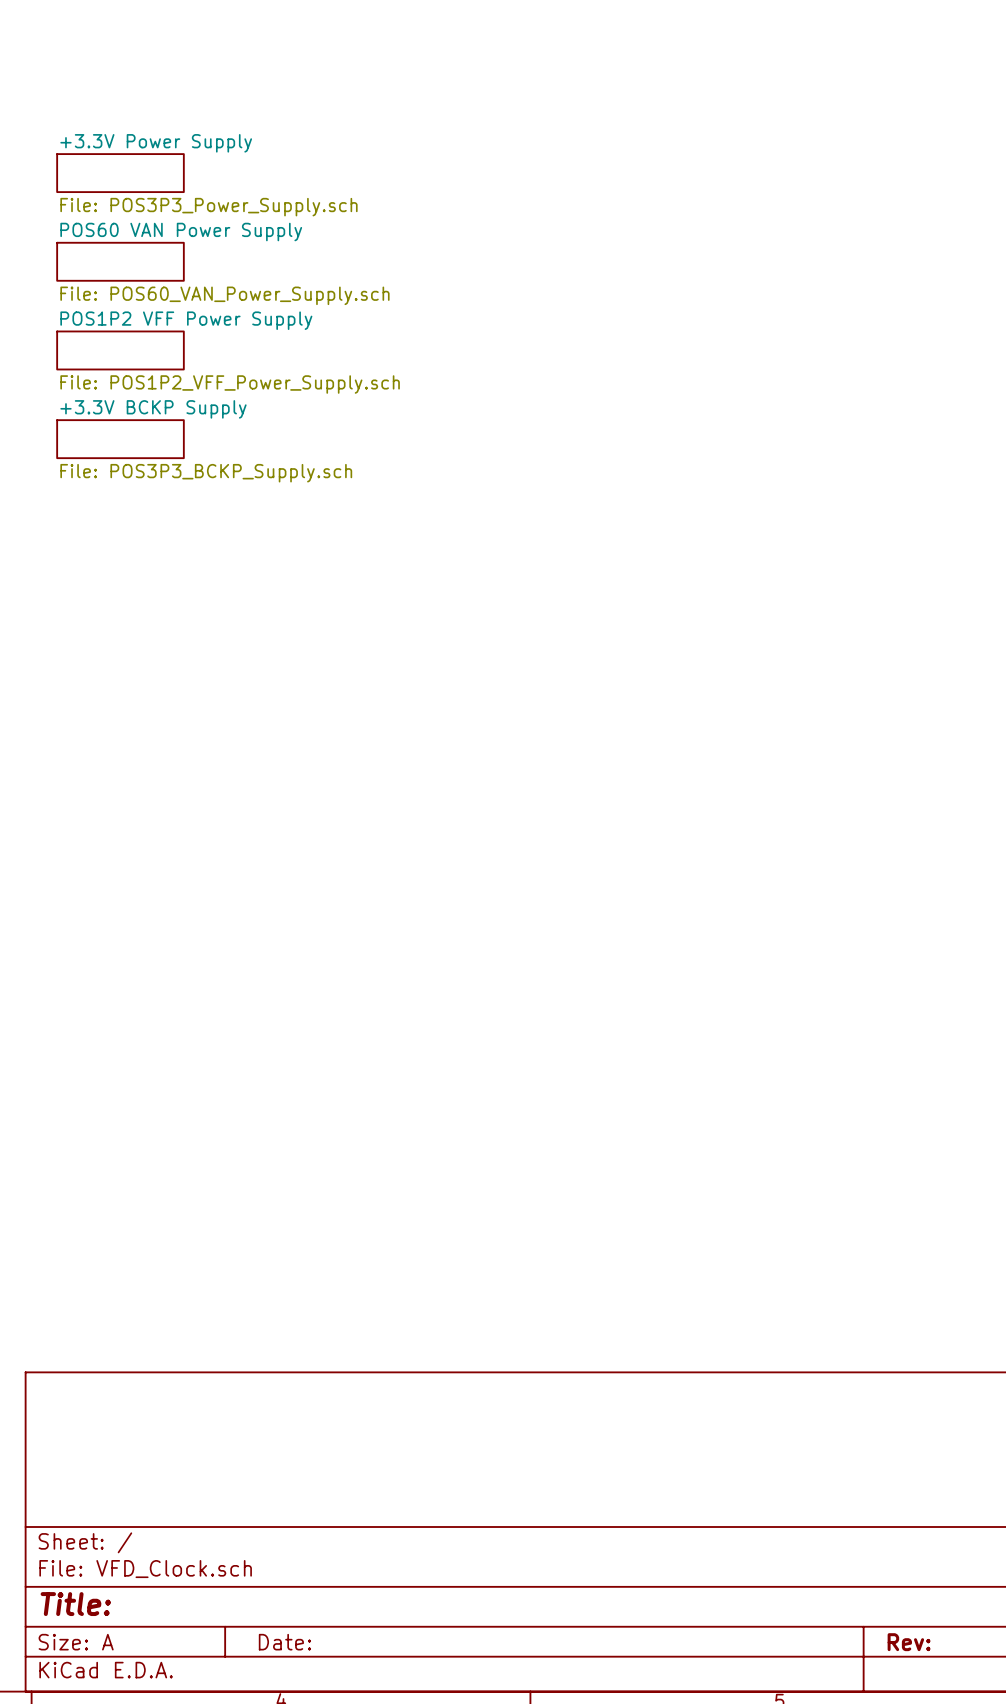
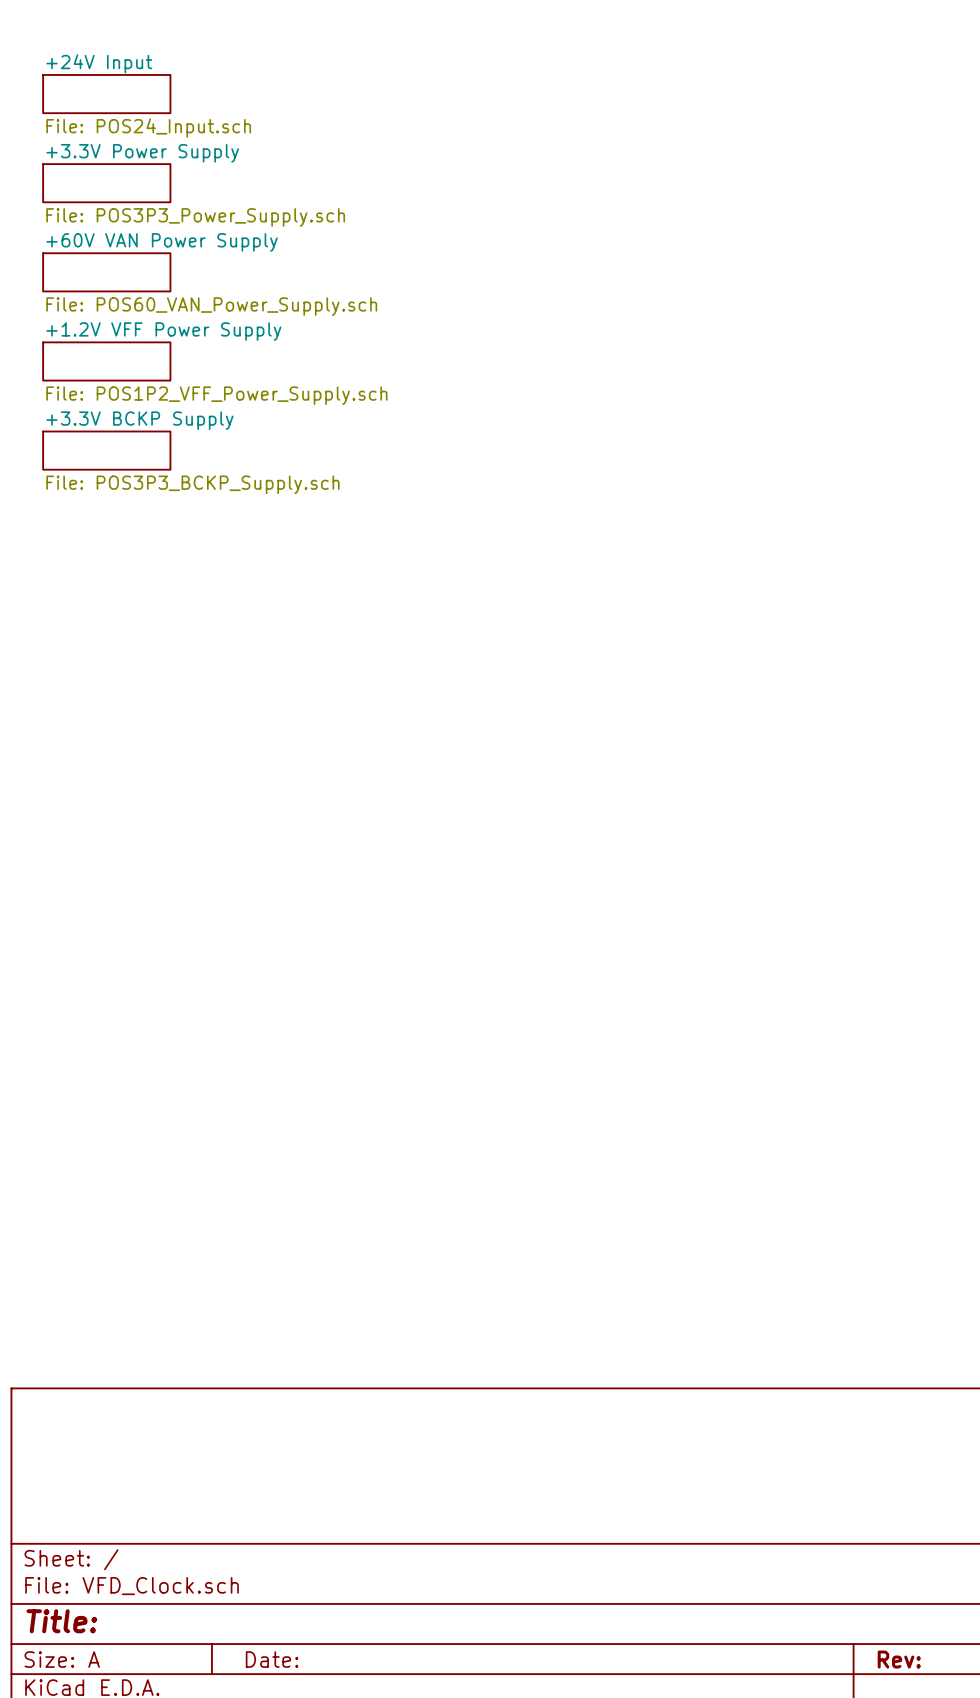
sheet +24V Input: none -> File: POS24_Input.sch (106, 94)
sheet POS60 VAN Power Supply name: POS60 VAN Power Supply (181, 232) -> +60V VAN Power Supply (162, 242)
sheet POS1P2 VFF Power Supply name: POS1P2 VFF Power Supply (186, 320) -> +1.2V VFF Power Supply (163, 331)

